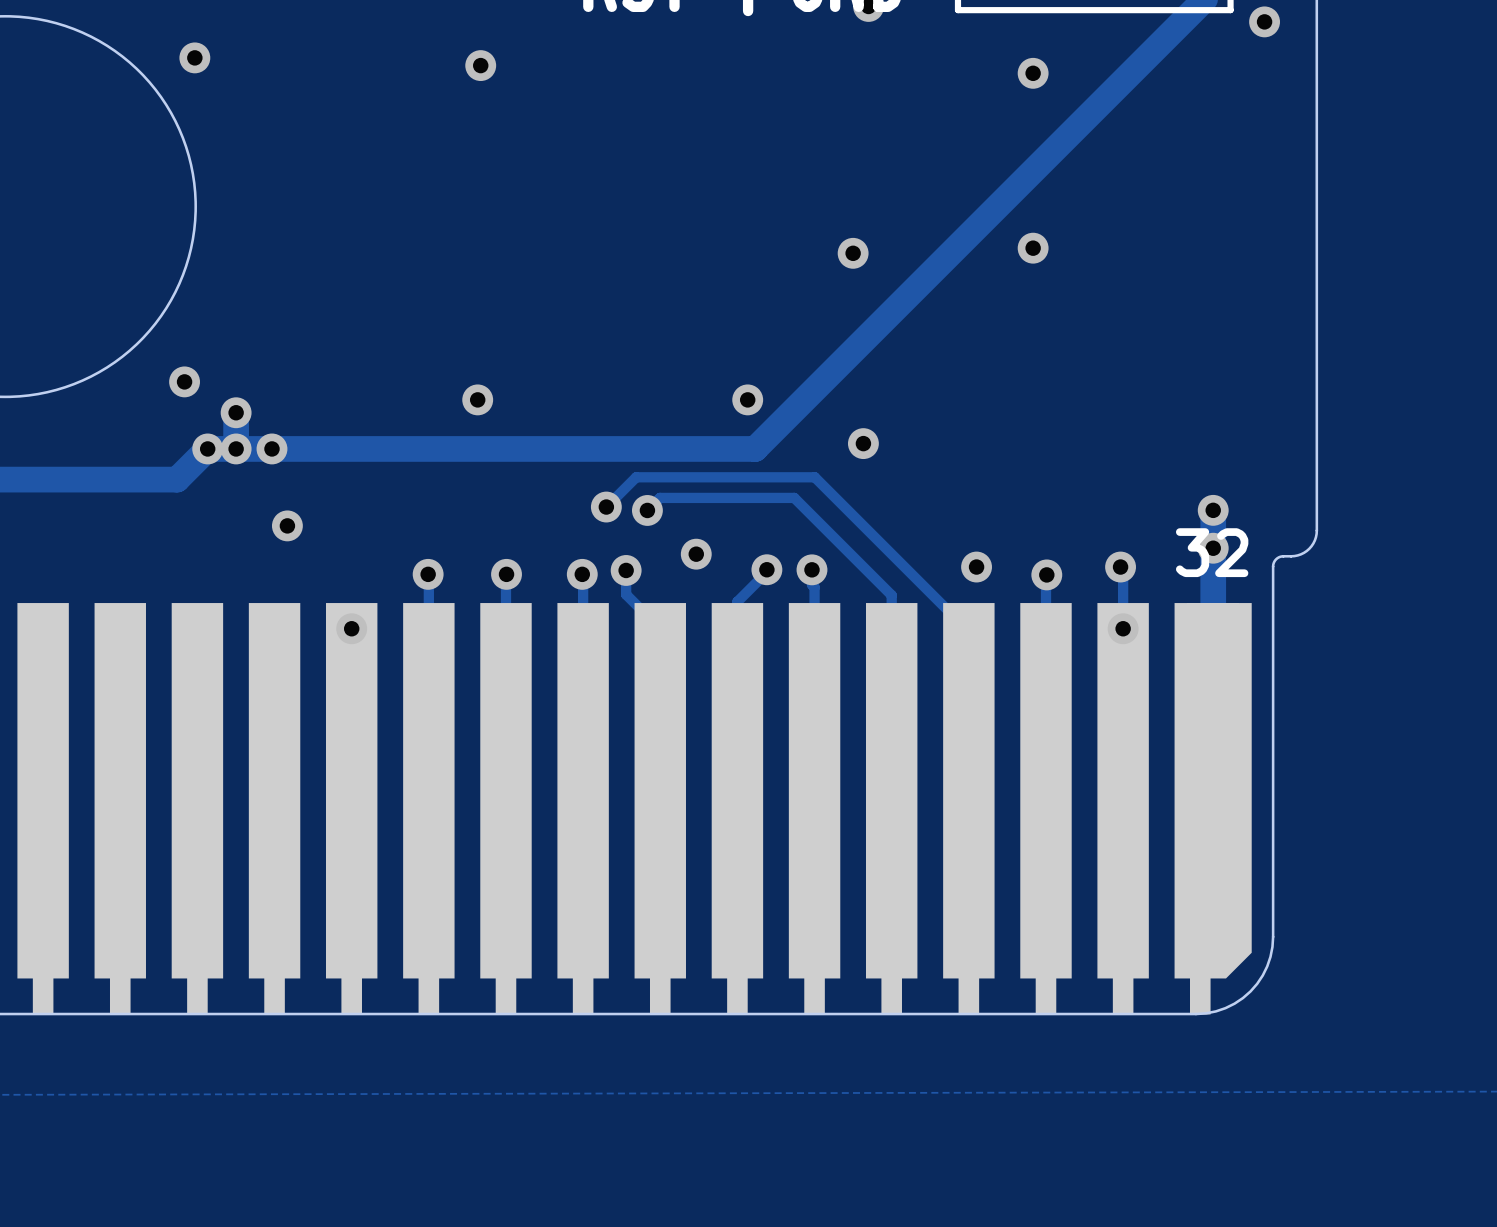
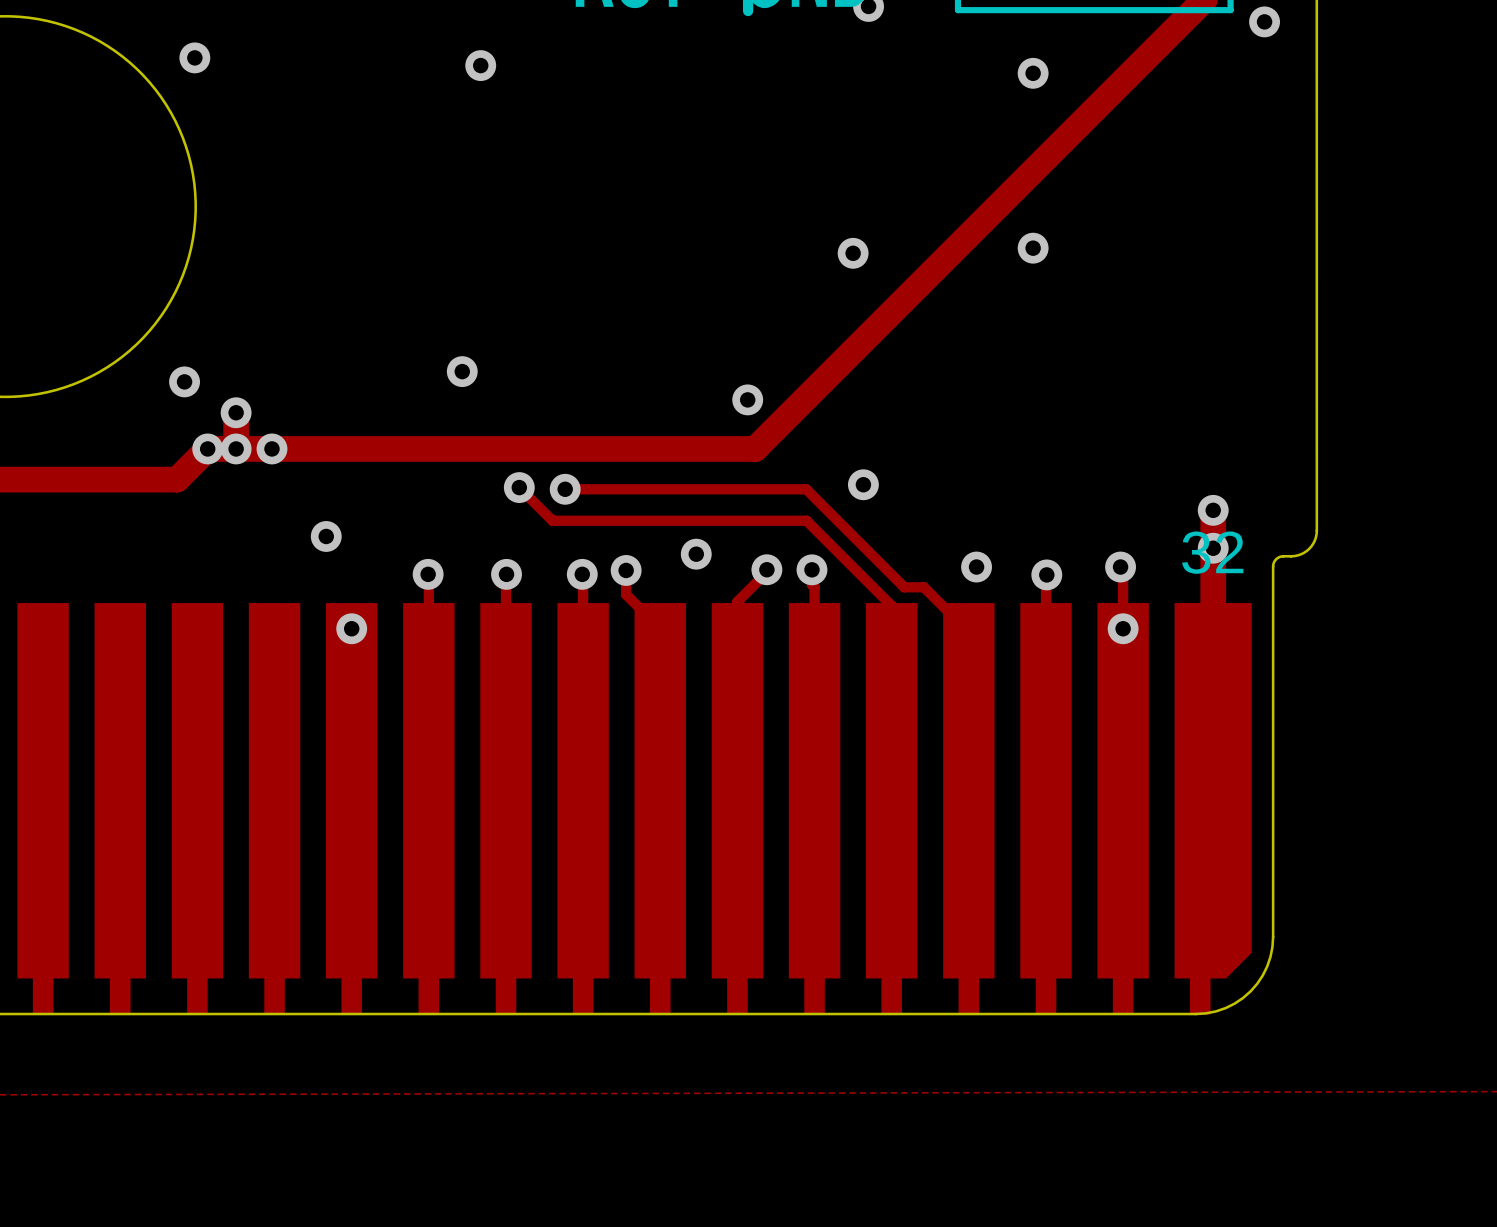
via position: (477, 399) -> (462, 371)
via position: (863, 443) -> (863, 484)
via: none -> (519, 487)
via: none -> (565, 489)
track: (606, 507) (636, 477) (814, 477) (966, 628) -> (565, 489) (806, 489) (904, 587) (923, 587) (965, 628)
via: (606, 507) -> none
track: (647, 510) (659, 497) (794, 497) (891, 595) (891, 605) -> (519, 487) (552, 520) (806, 520) (891, 605)
via: (647, 510) -> none
via position: (287, 525) -> (326, 536)

